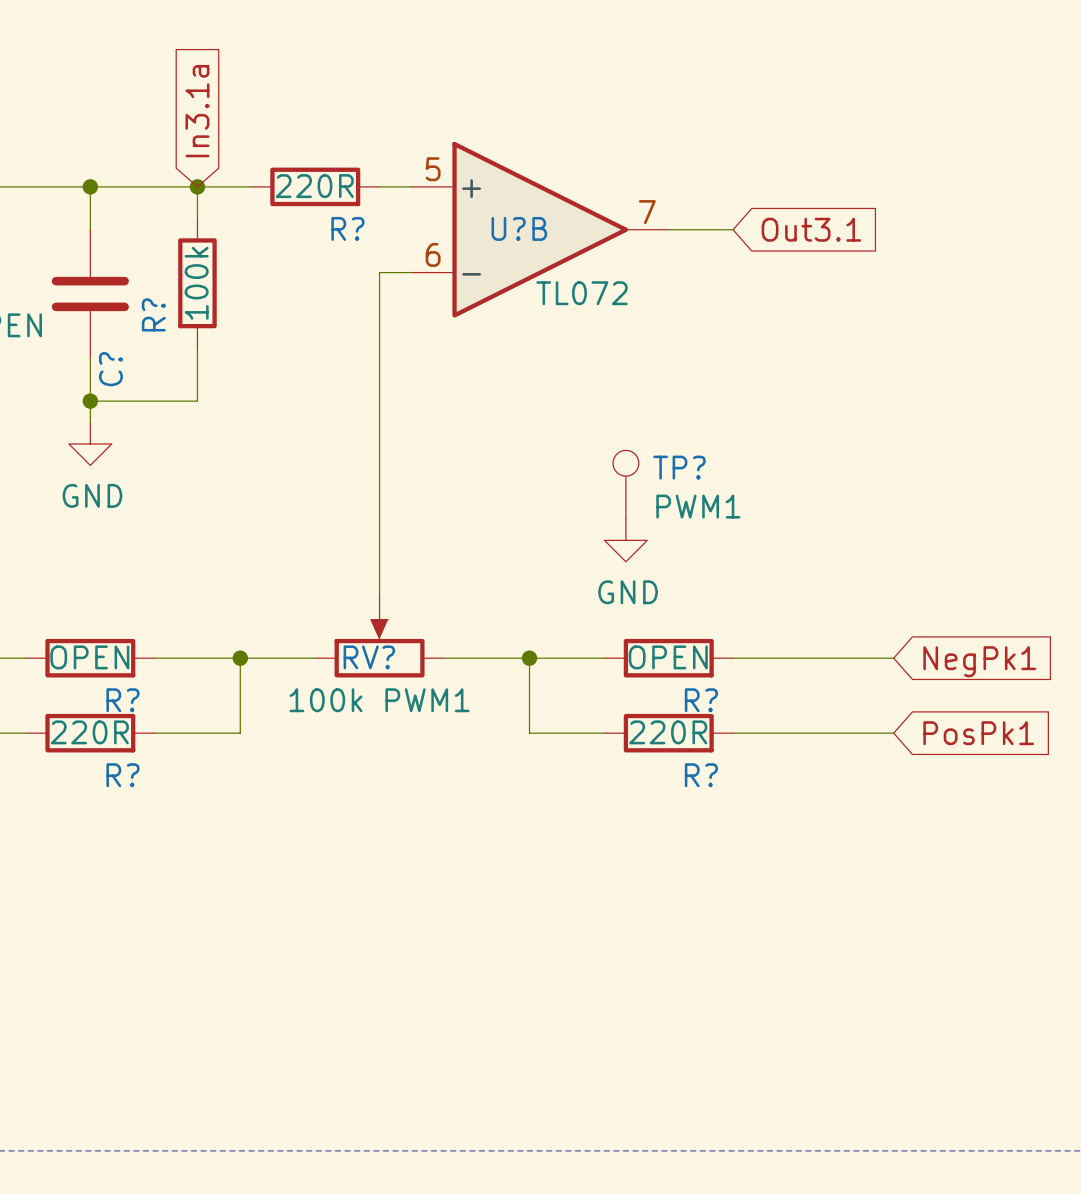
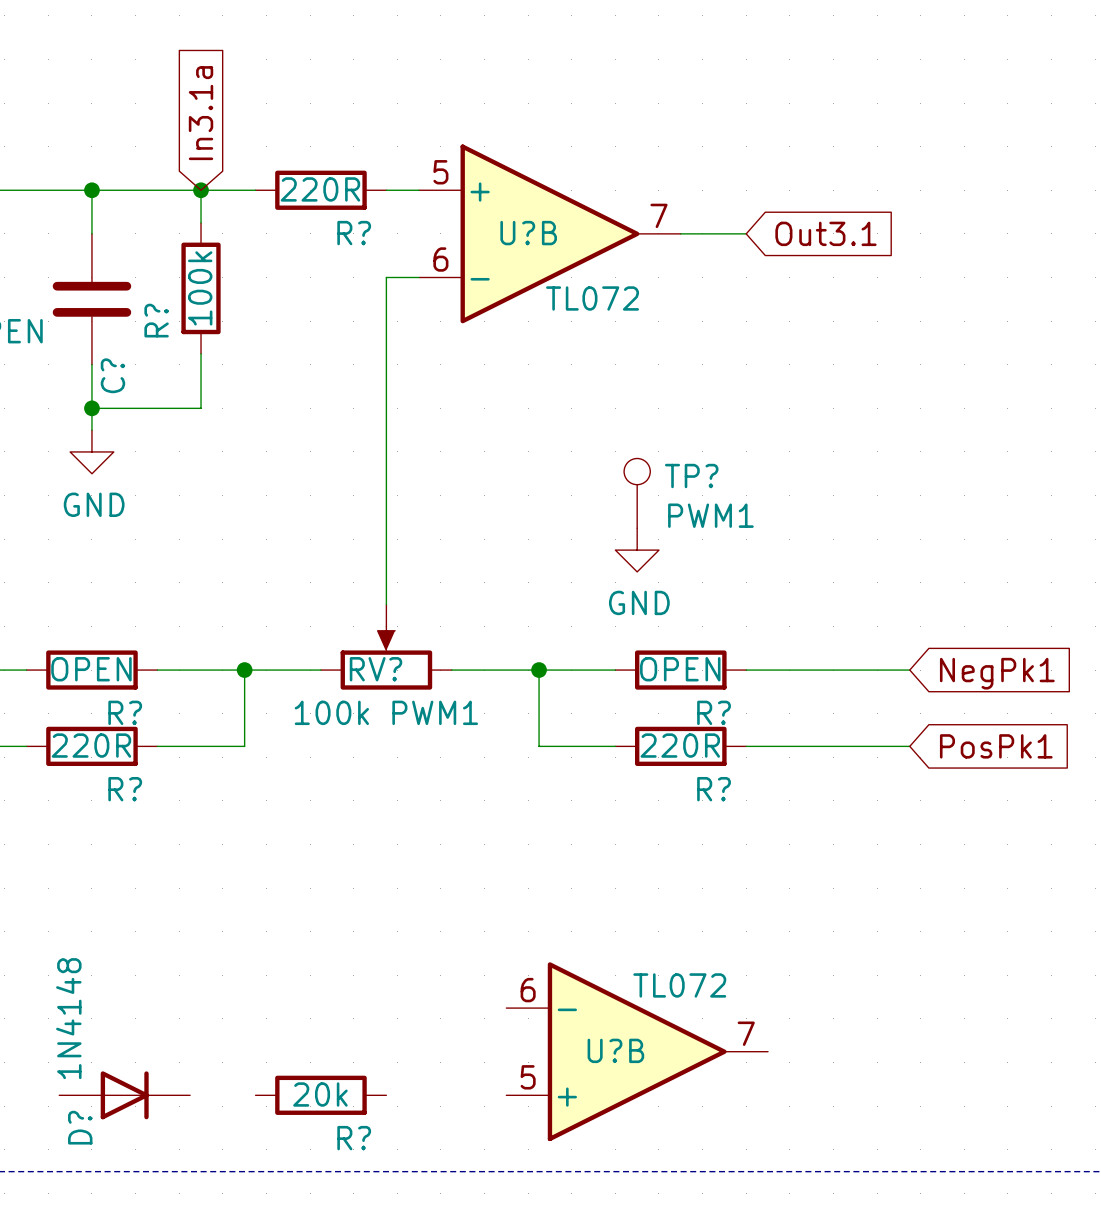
U?B: none -> TL072 (637, 1051)
D?: none -> 1N4148 (124, 1095)
R?: none -> 20k (320, 1095)

